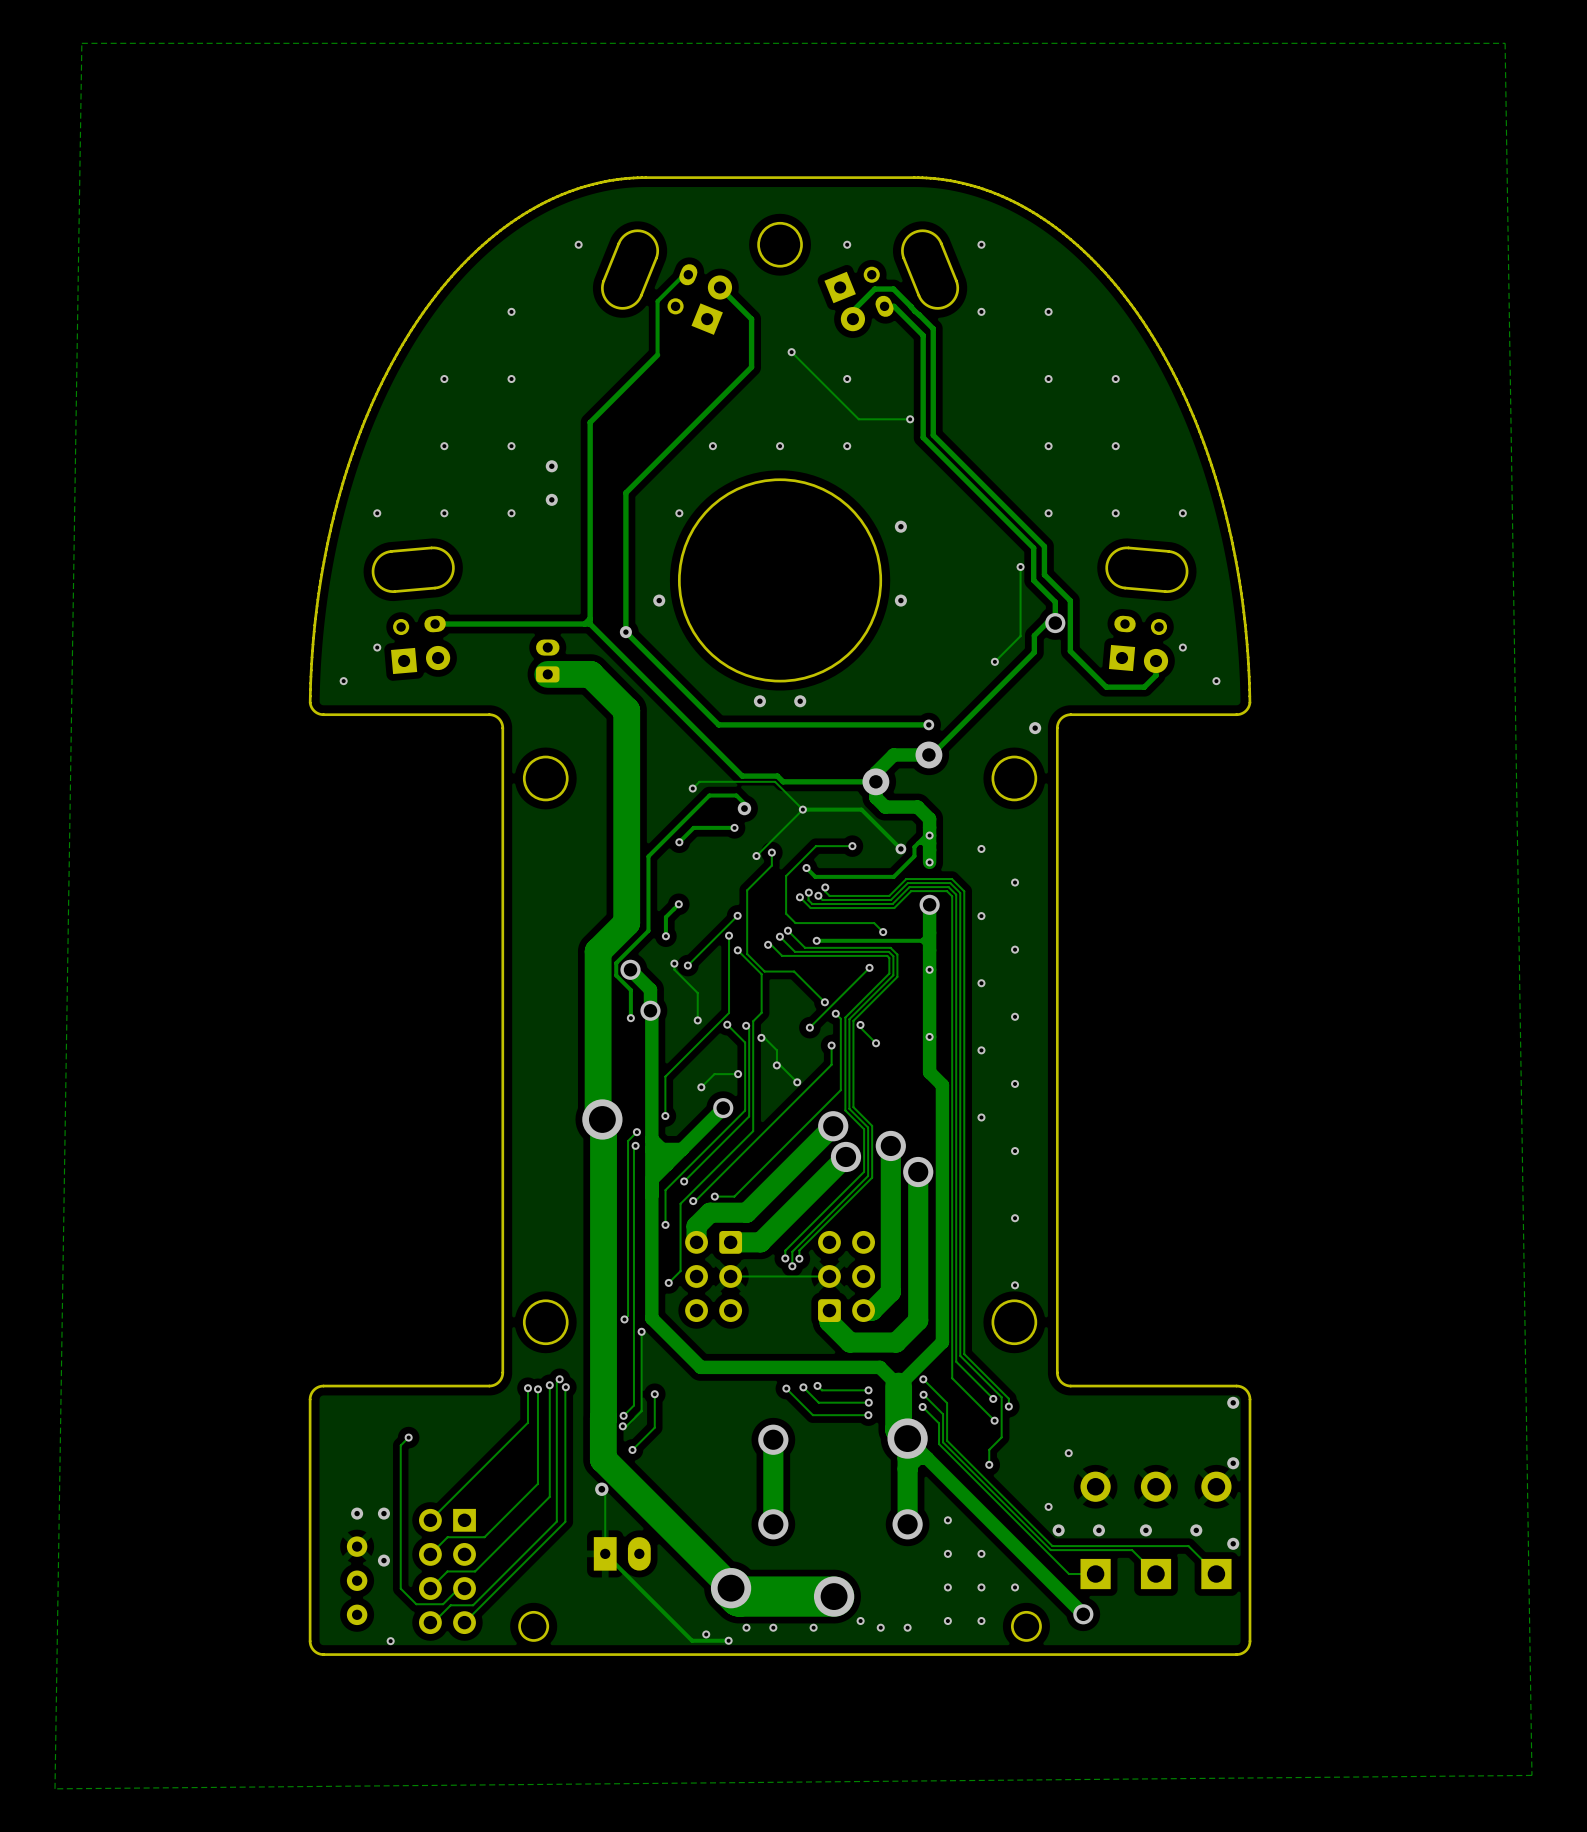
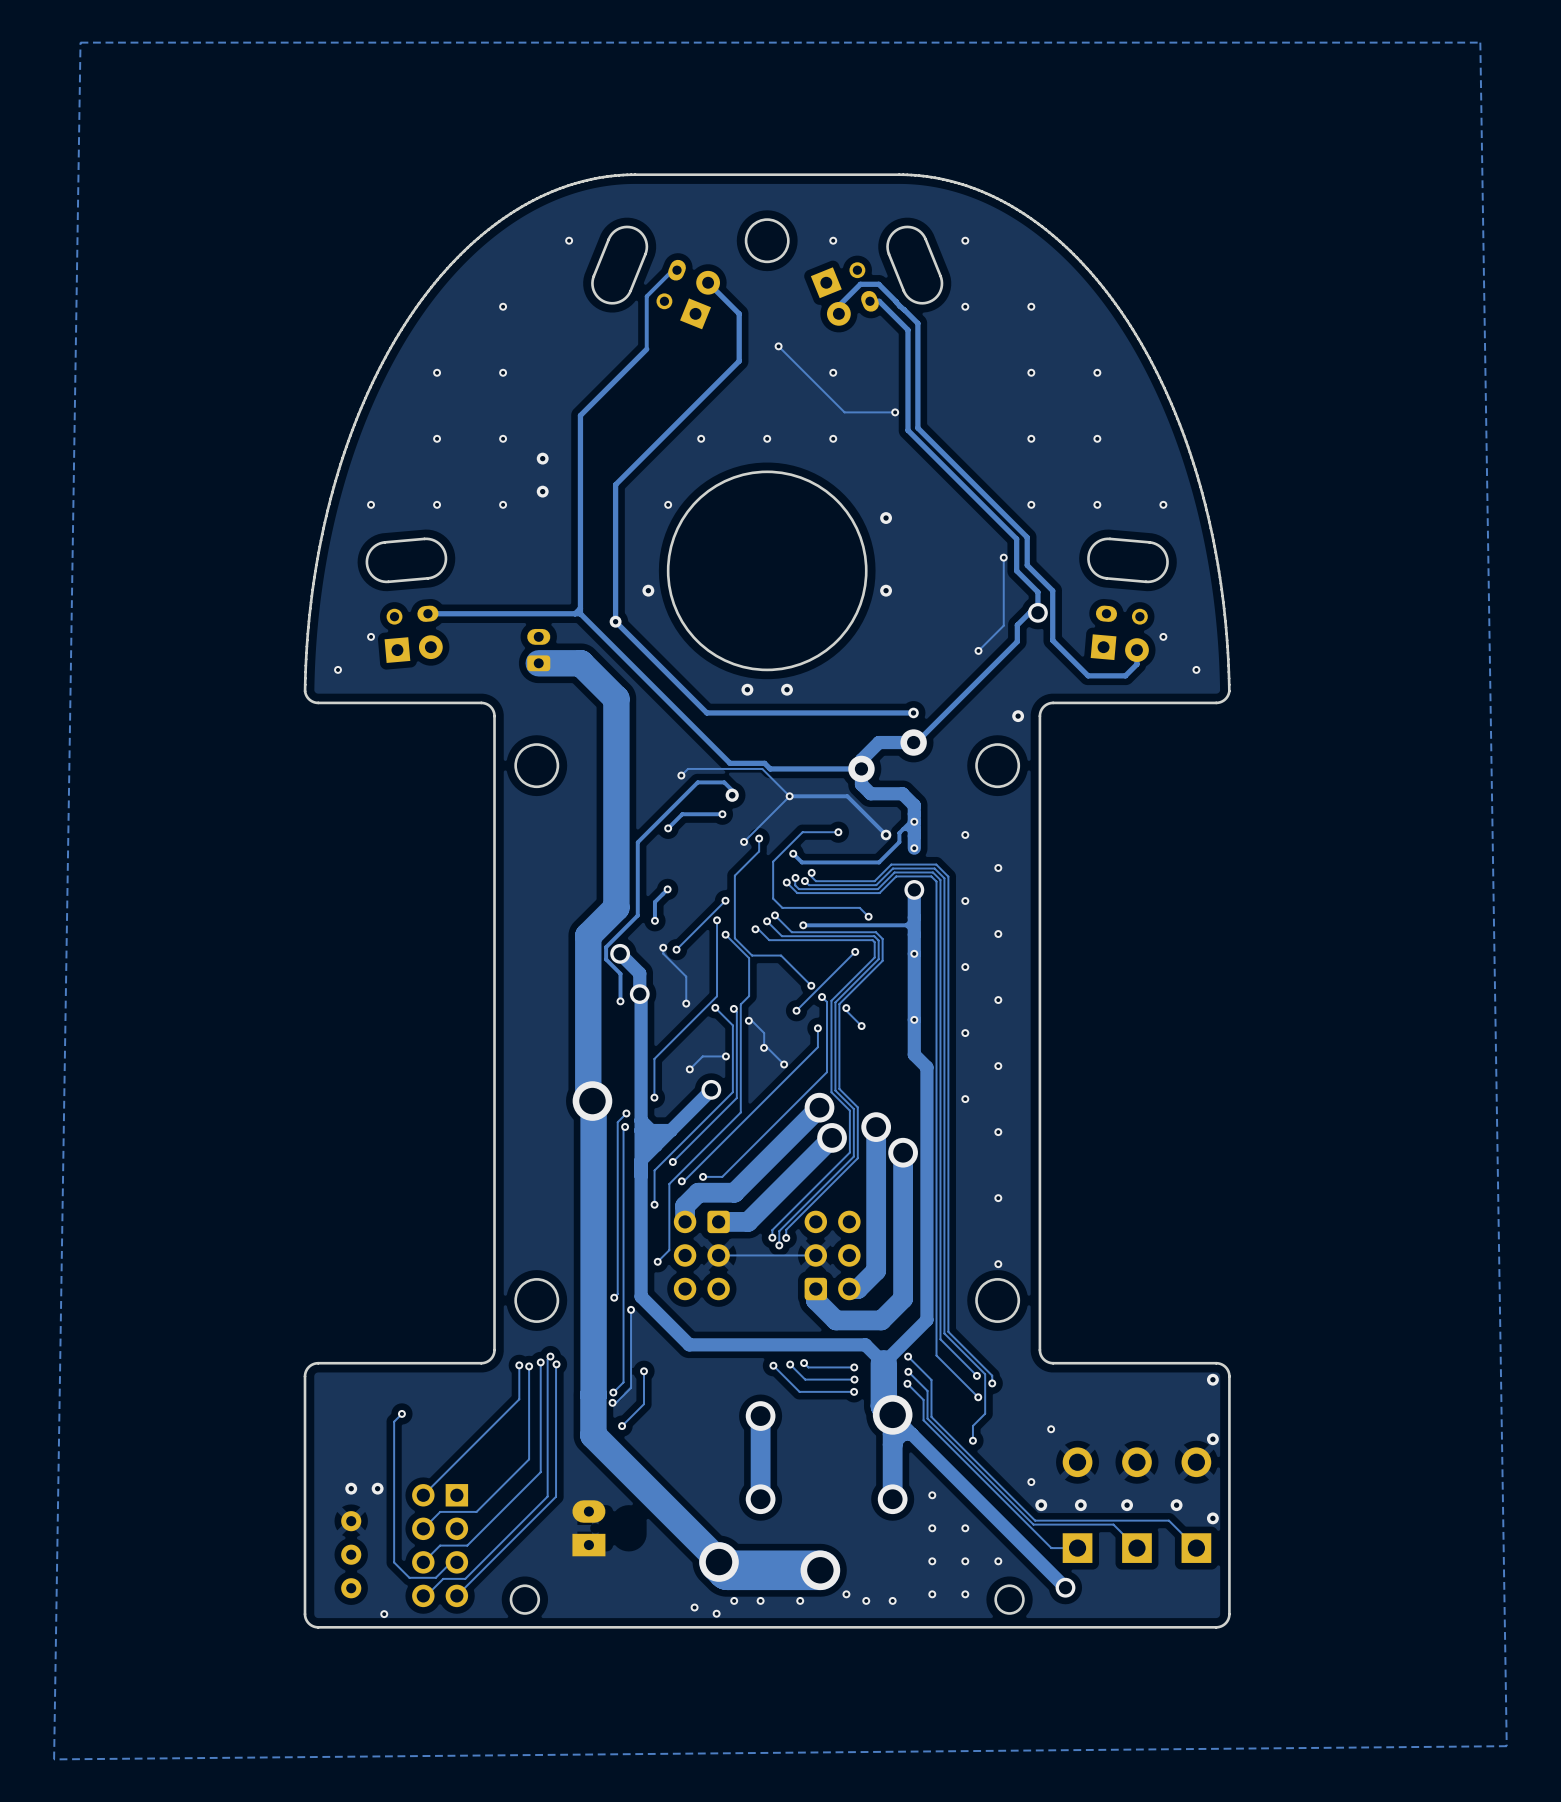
track: (601, 1489) (605, 1492) (605, 1553) (692, 1640) (728, 1640) -> none
via: (601, 1489) -> none
part rotation: 0° (622, 1553) -> 90° counterclockwise (588, 1528)
via: (383, 1560) -> none

